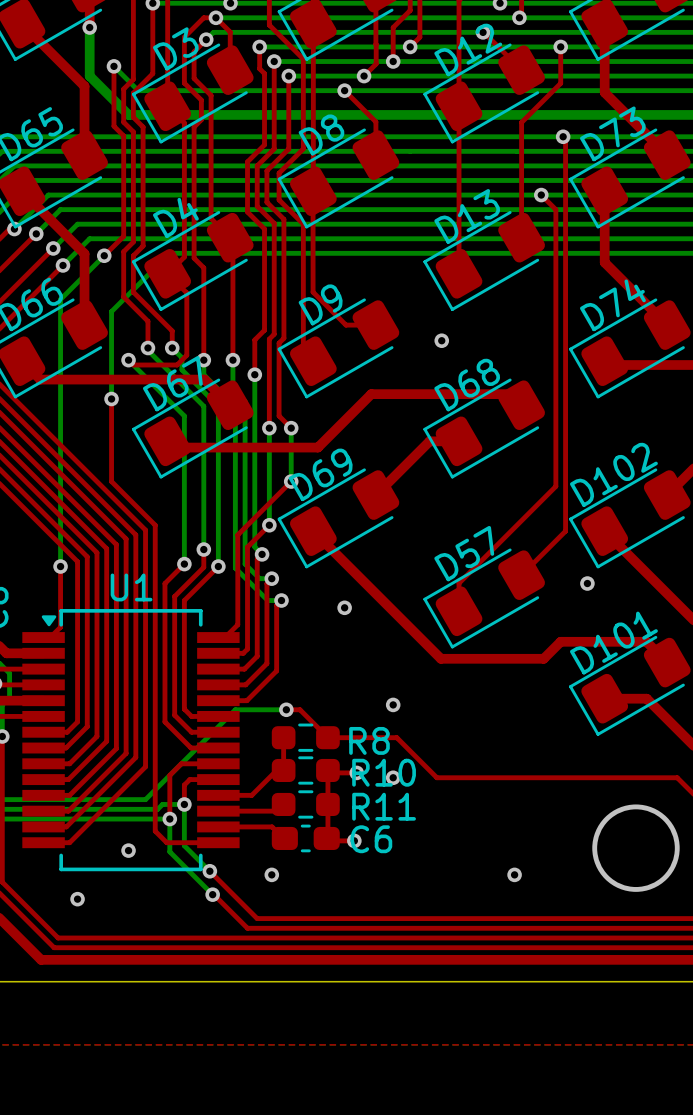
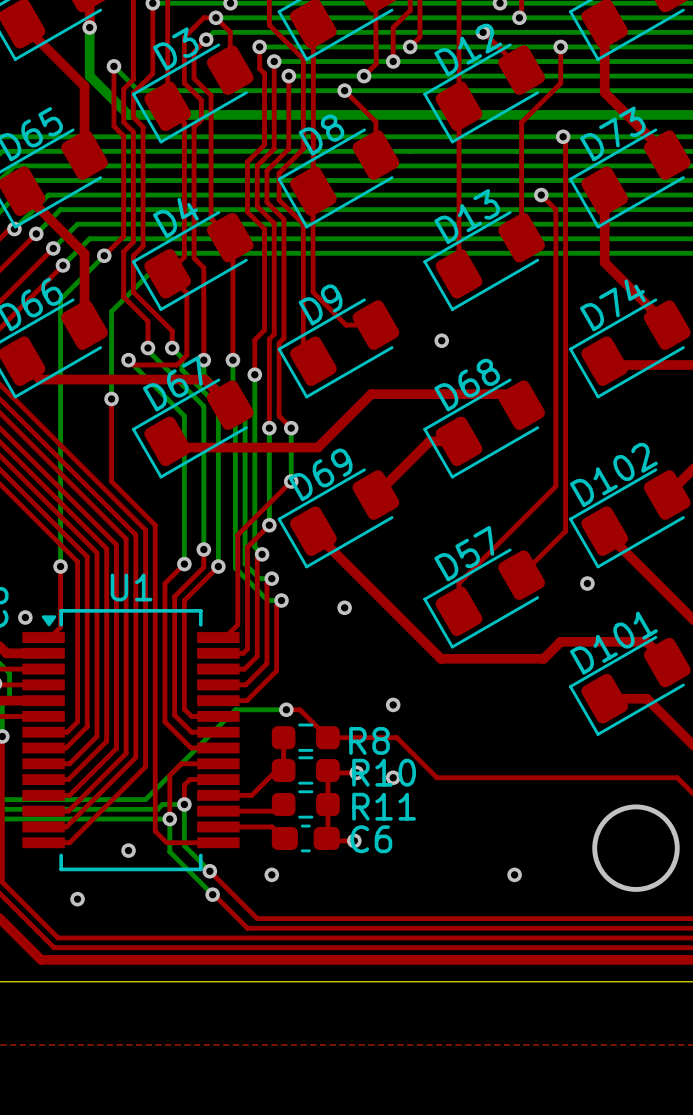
via: none -> (25, 617)

